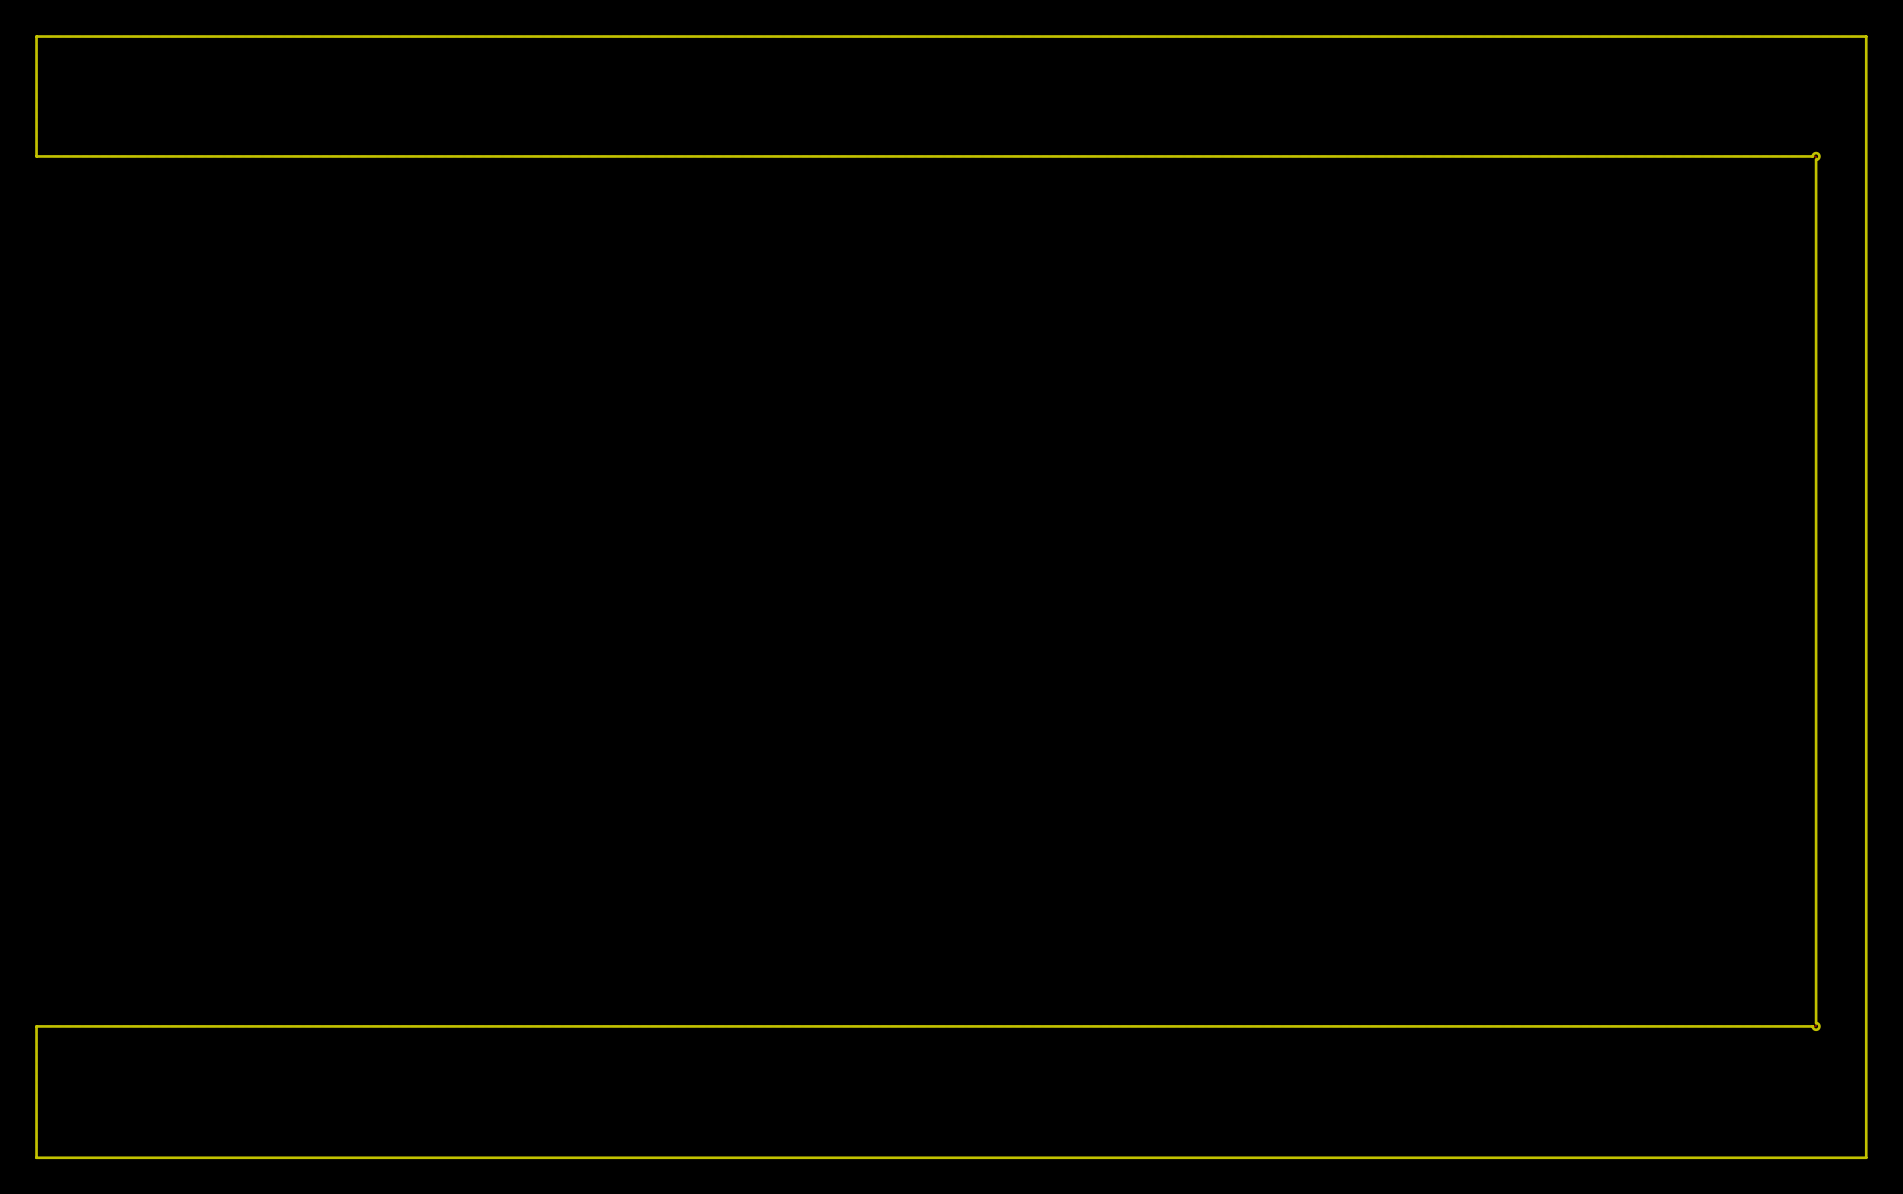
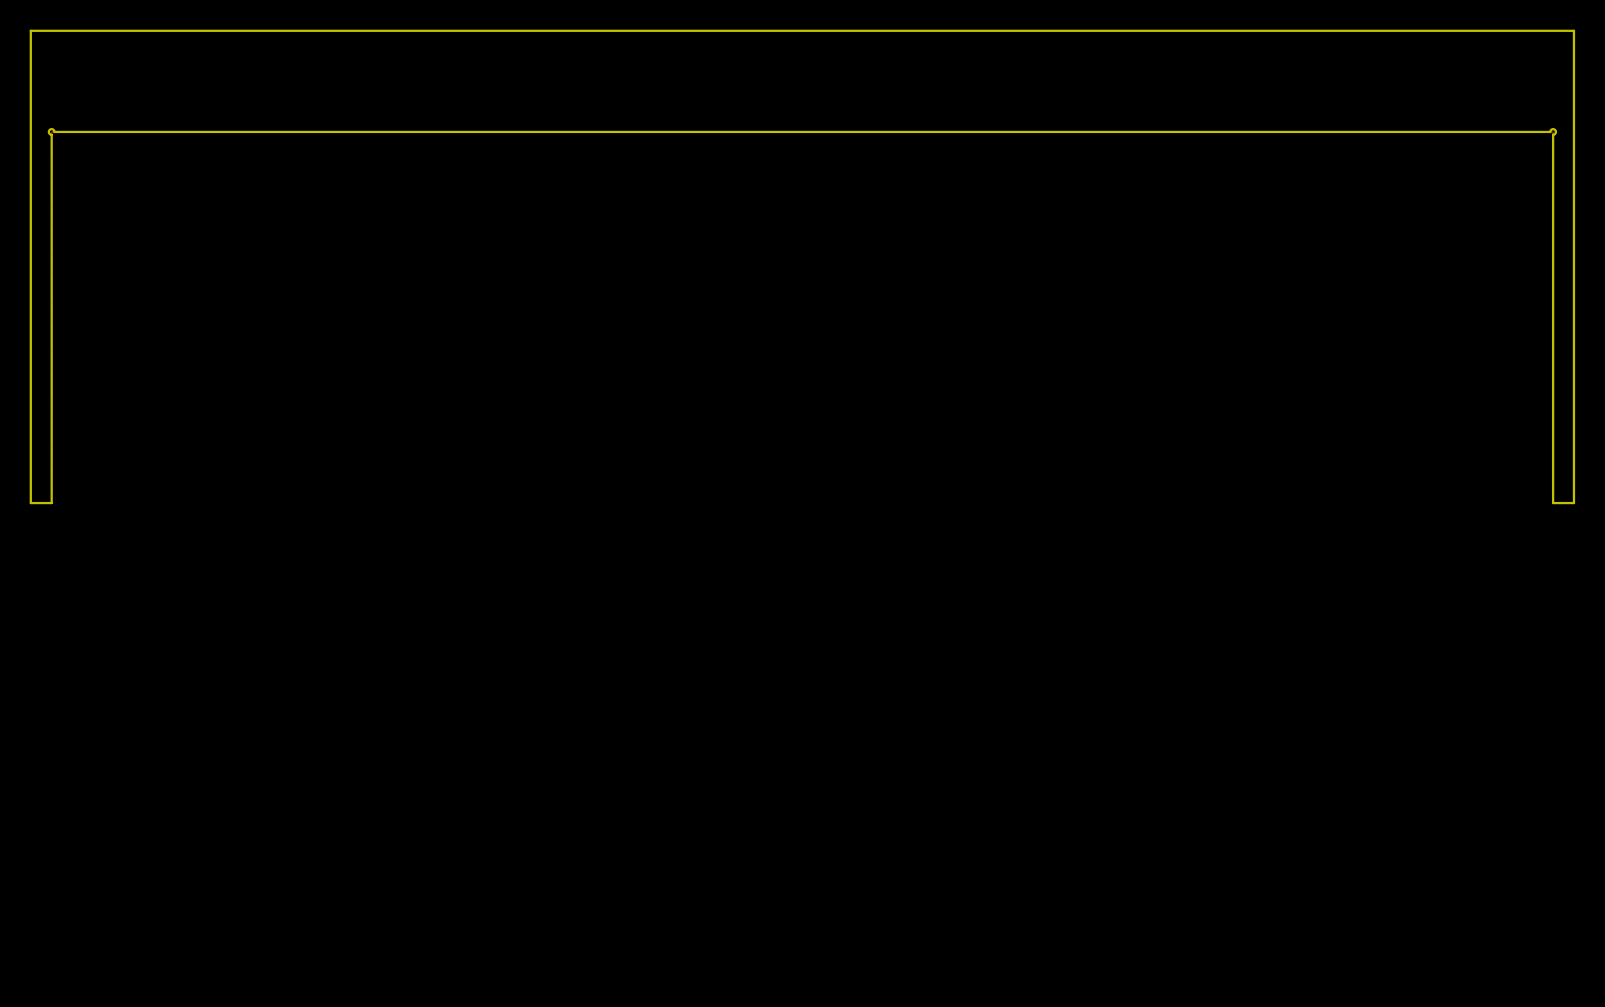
board edge: (36, 156) (64, 156) -> (30, 131) (30, 503) (51, 503) (51, 134) (48, 131) (51, 129) (54, 131)
board edge: (1812, 156) (1815, 153) (1819, 156) (1816, 159) (1816, 1023) (1819, 1025) (1817, 1029) (1814, 1029) (1812, 1026) (36, 1026) (36, 1157) (1866, 1157) (1866, 596) -> (1528, 131) (1550, 131) (1553, 129) (1555, 131) (1553, 134) (1553, 503) (1573, 503)

